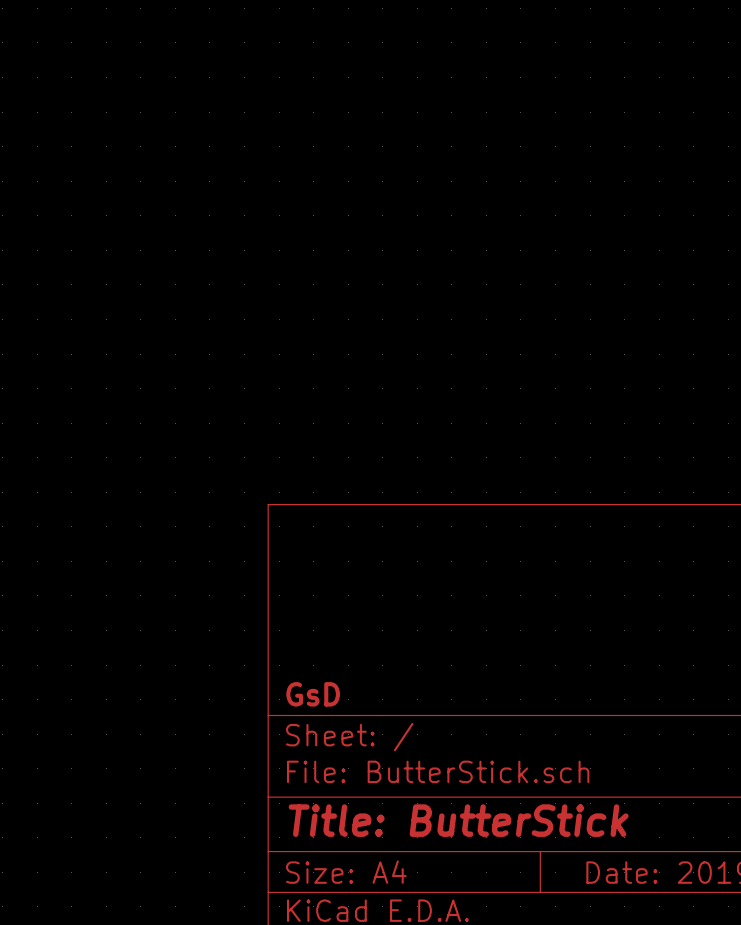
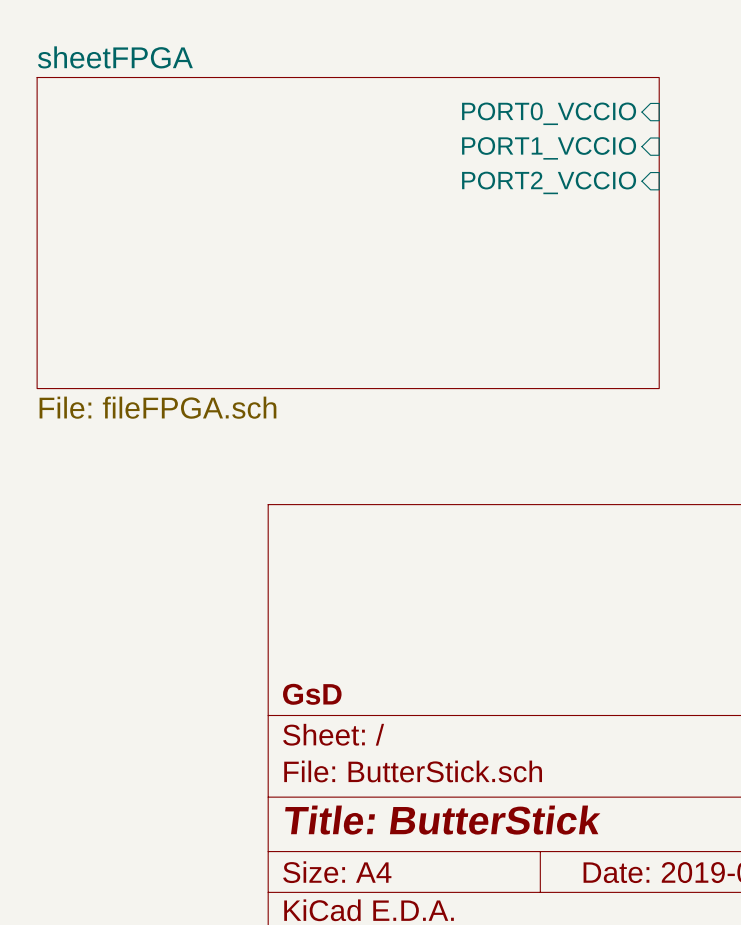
sheet pin: none -> PORT0_VCCIO (549, 113)
sheet pin: none -> PORT1_VCCIO (549, 148)
sheet pin: none -> PORT2_VCCIO (549, 182)
sheet sheetFPGA: none -> File: fileFPGA.sch (348, 233)

